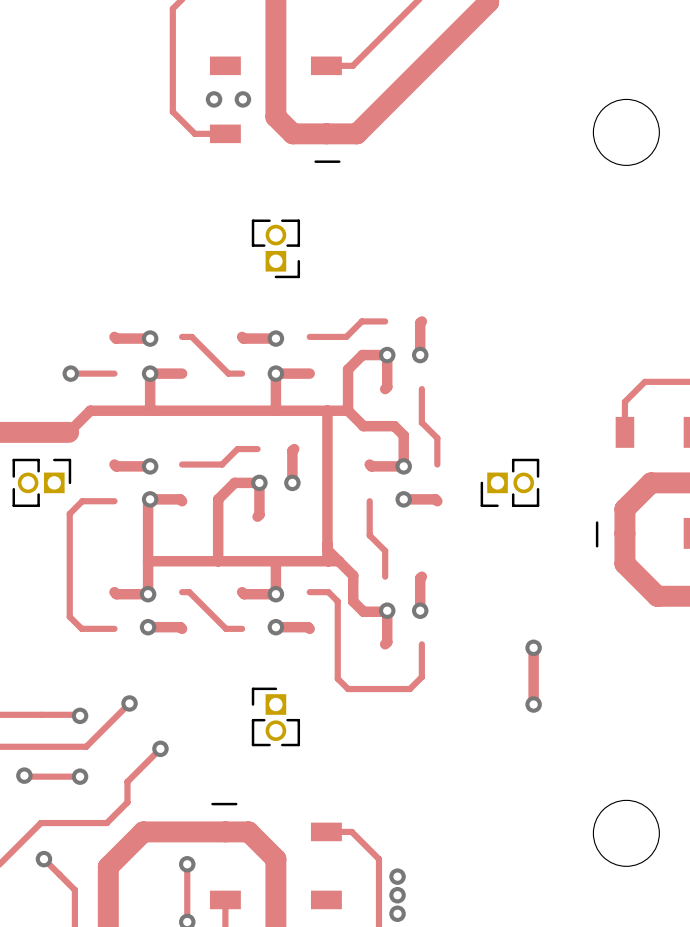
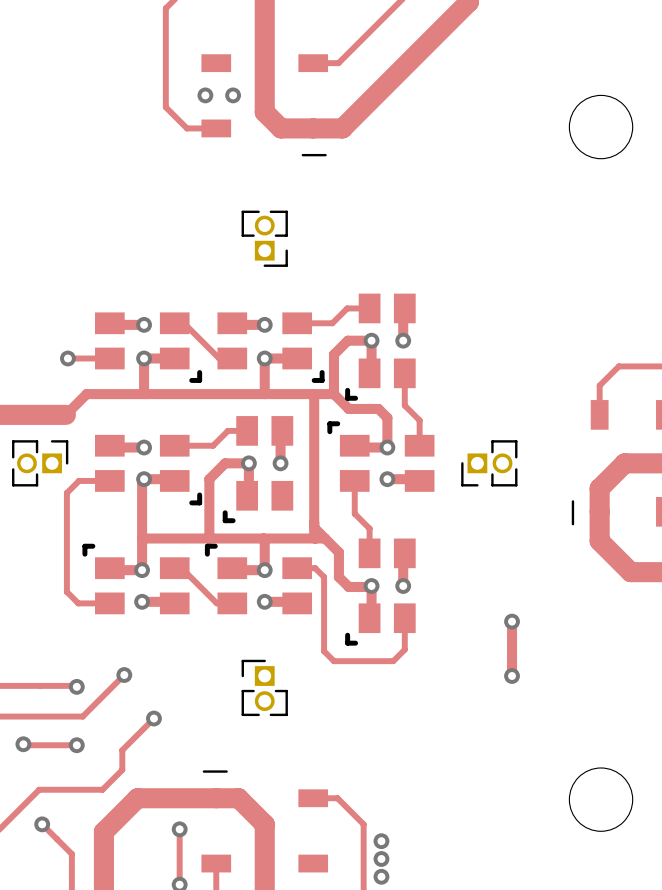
part: none -> (380, 347)
part: none -> (148, 347)
part: none -> (271, 347)
part: none -> (380, 456)
part: none -> (148, 470)
part: none -> (257, 469)
part: none -> (136, 579)
part: none -> (258, 579)
part: none -> (380, 592)

